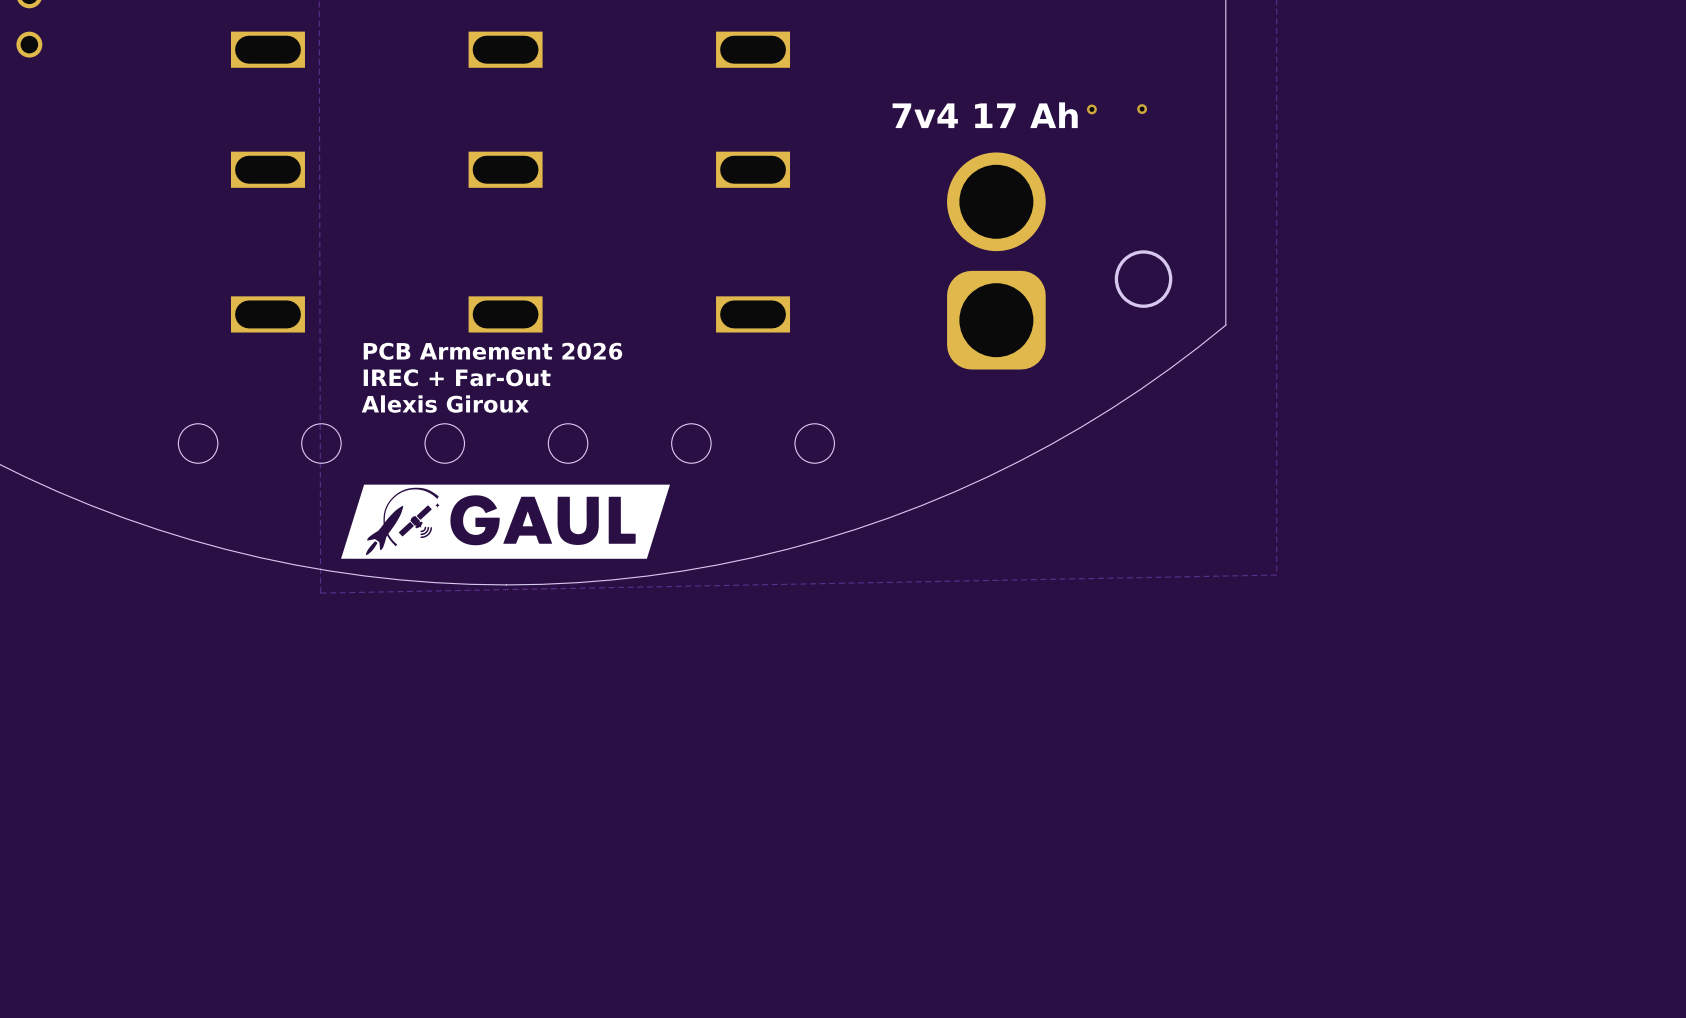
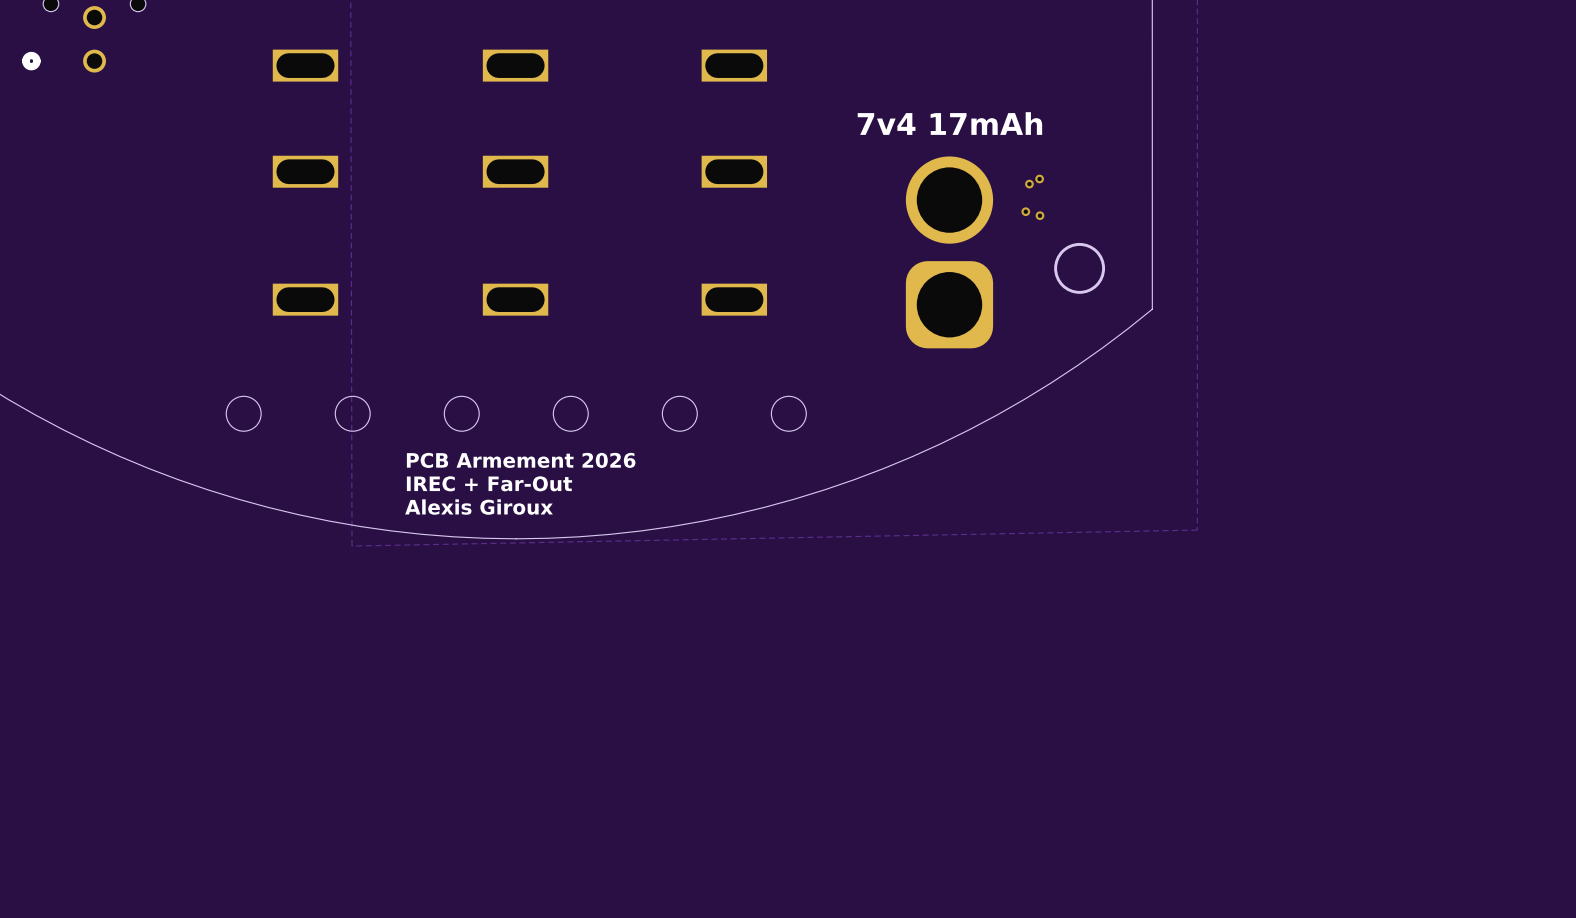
via: (1091, 109) -> none
via: (1142, 109) -> none
text: 7v4 17 Ah (985, 115) -> 7v4 17mAh (949, 123)
via: none -> (1039, 178)
via: none -> (1029, 184)
via: none -> (1025, 211)
via: none -> (1039, 215)
text position: PCB Armement 2026 (492, 351) -> PCB Armement 2026 (521, 460)
text position: IREC + Far-Out (457, 377) -> IREC + Far-Out (489, 483)
text position: Alexis Giroux (445, 404) -> Alexis Giroux (479, 507)
drawing: [341, 484, 670, 559] -> none

